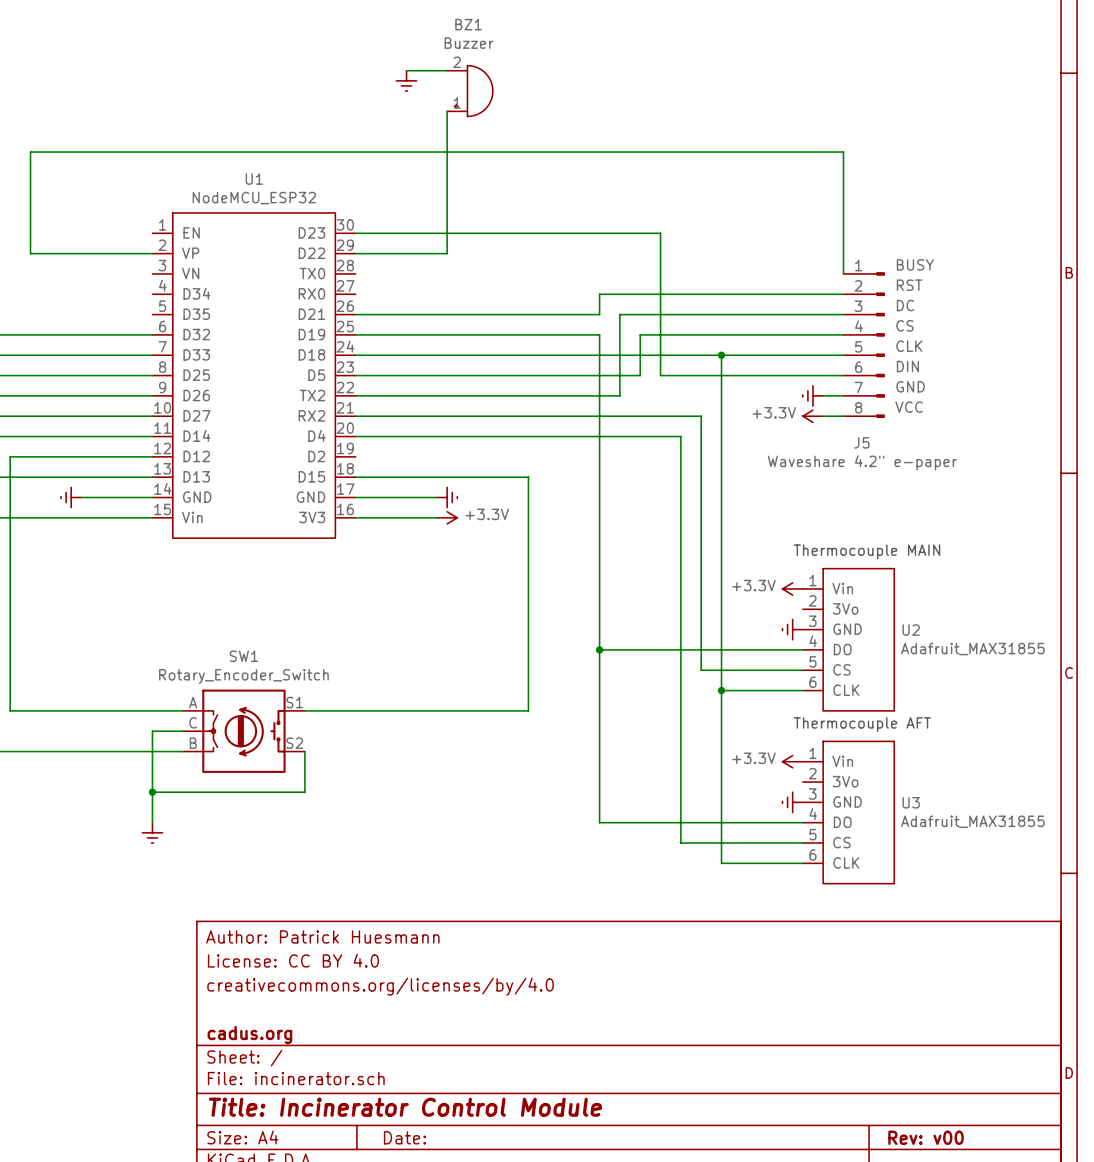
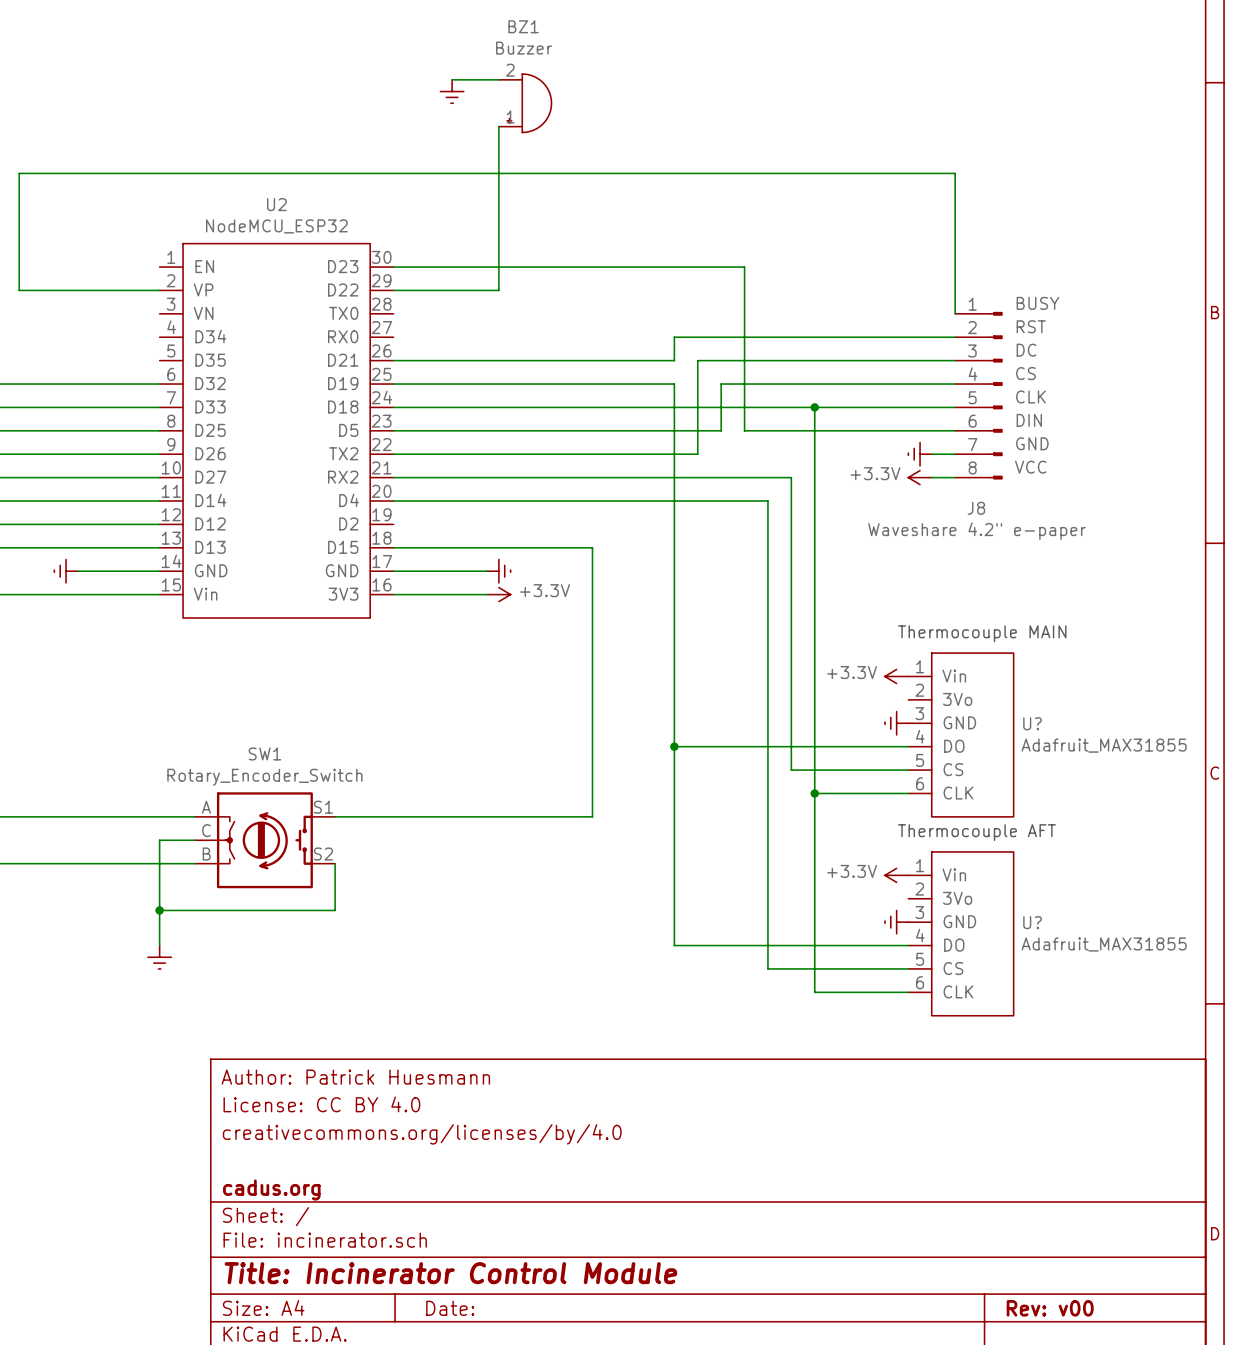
U1 name: U1 (254, 179) -> U2 (276, 204)
J5 name: J5 (861, 442) -> J8 (976, 508)
U2 name: U2 (911, 630) -> U? (1032, 723)
U3 name: U3 (911, 802) -> U? (1032, 922)

